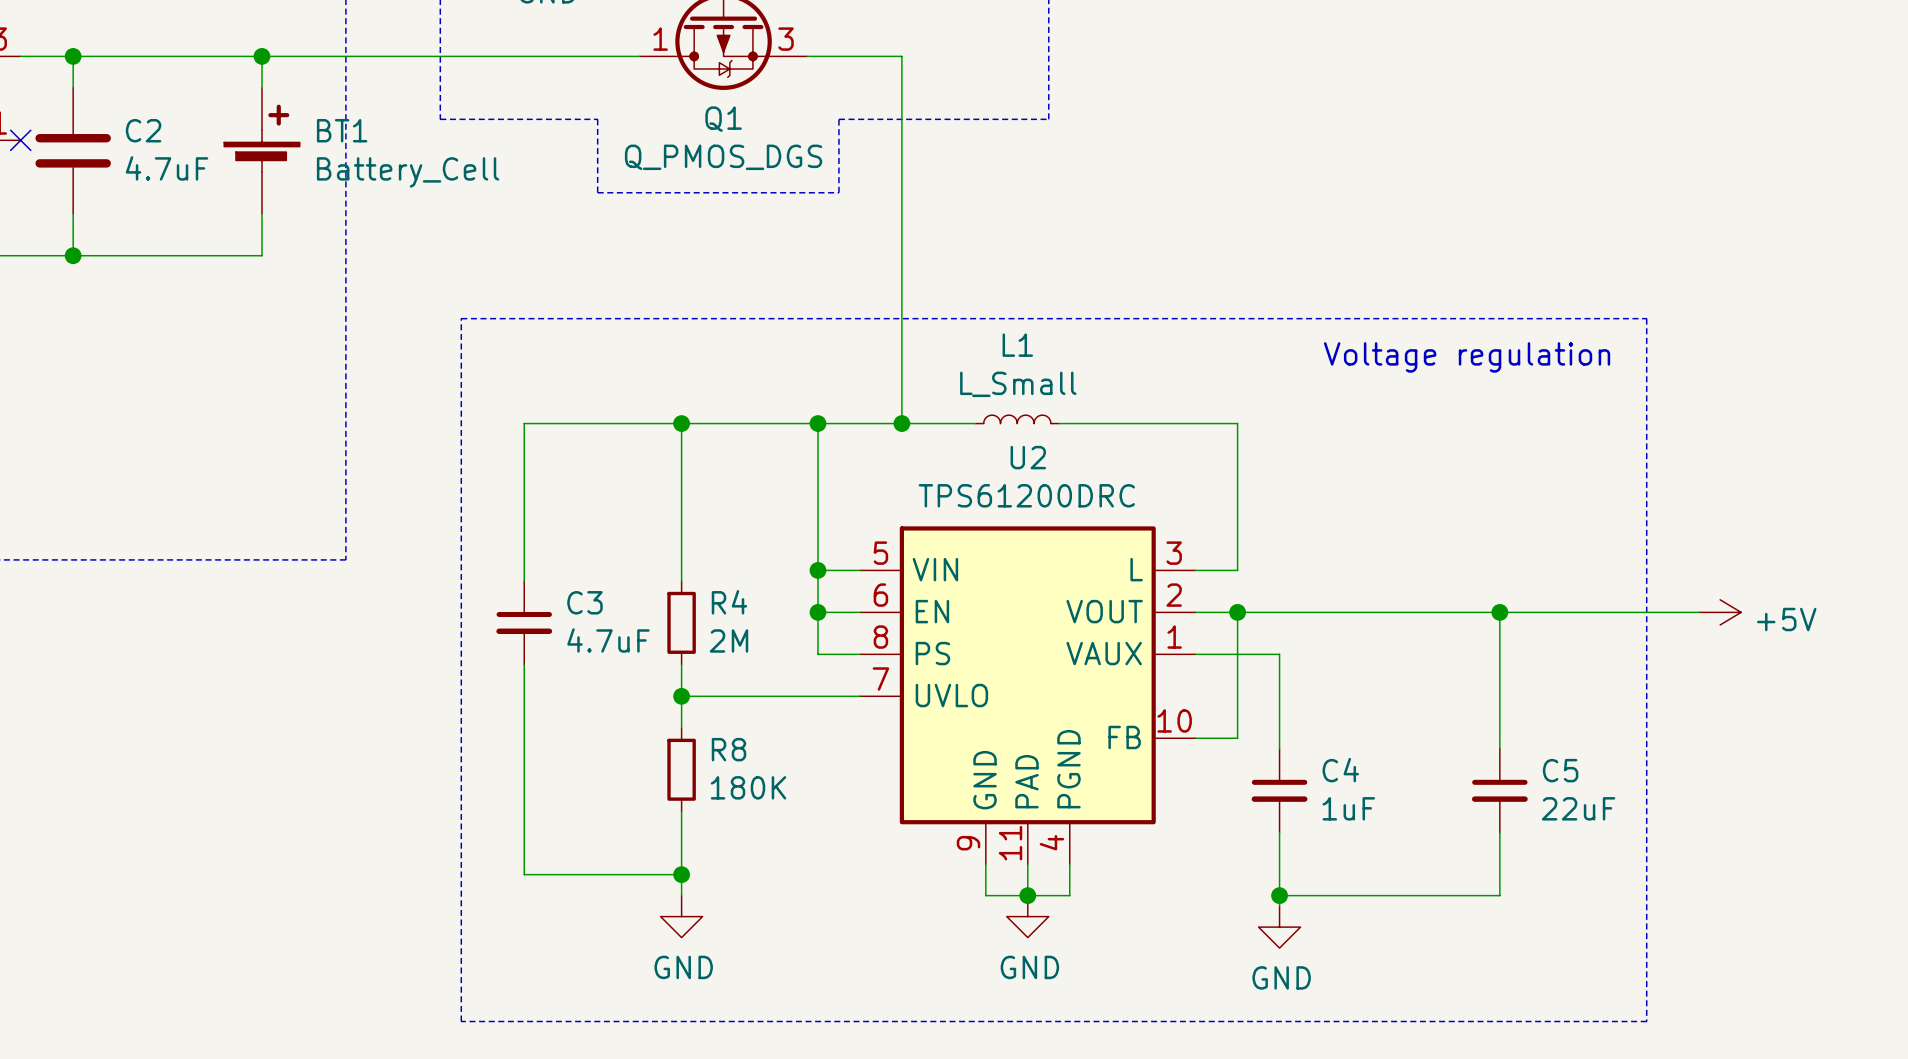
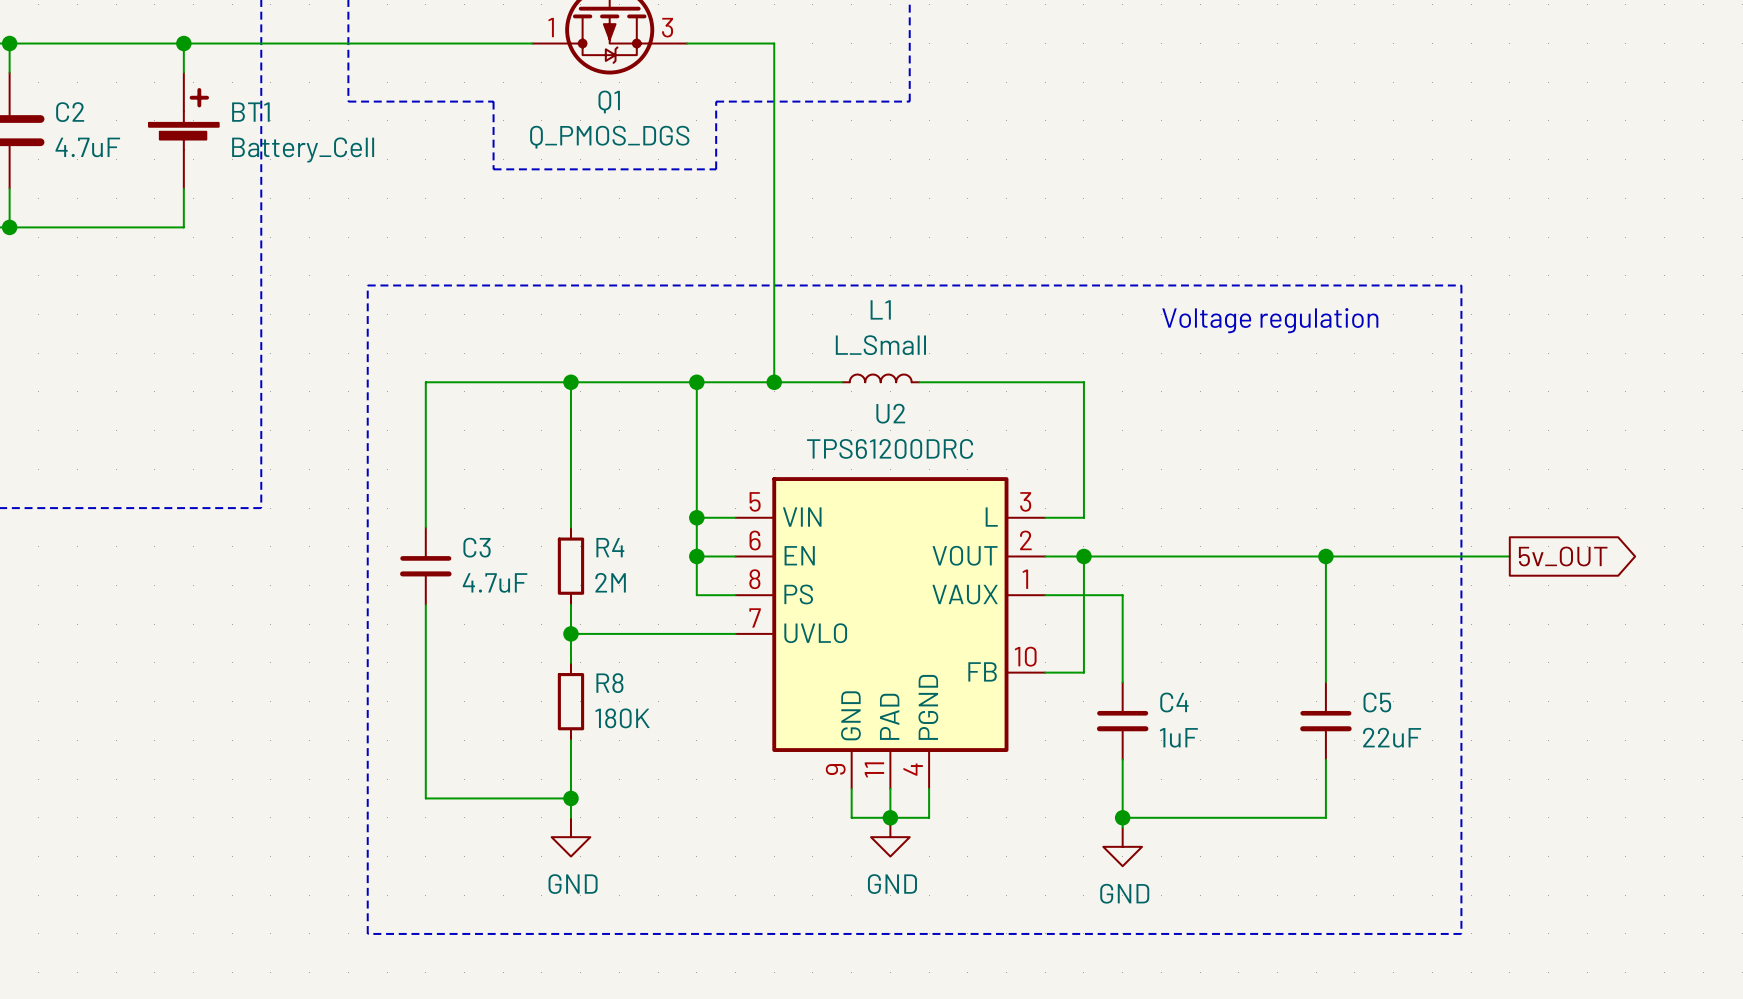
power symbol: +5V (1720, 612) -> none
global label: none -> 5v_OUT (1563, 556)

